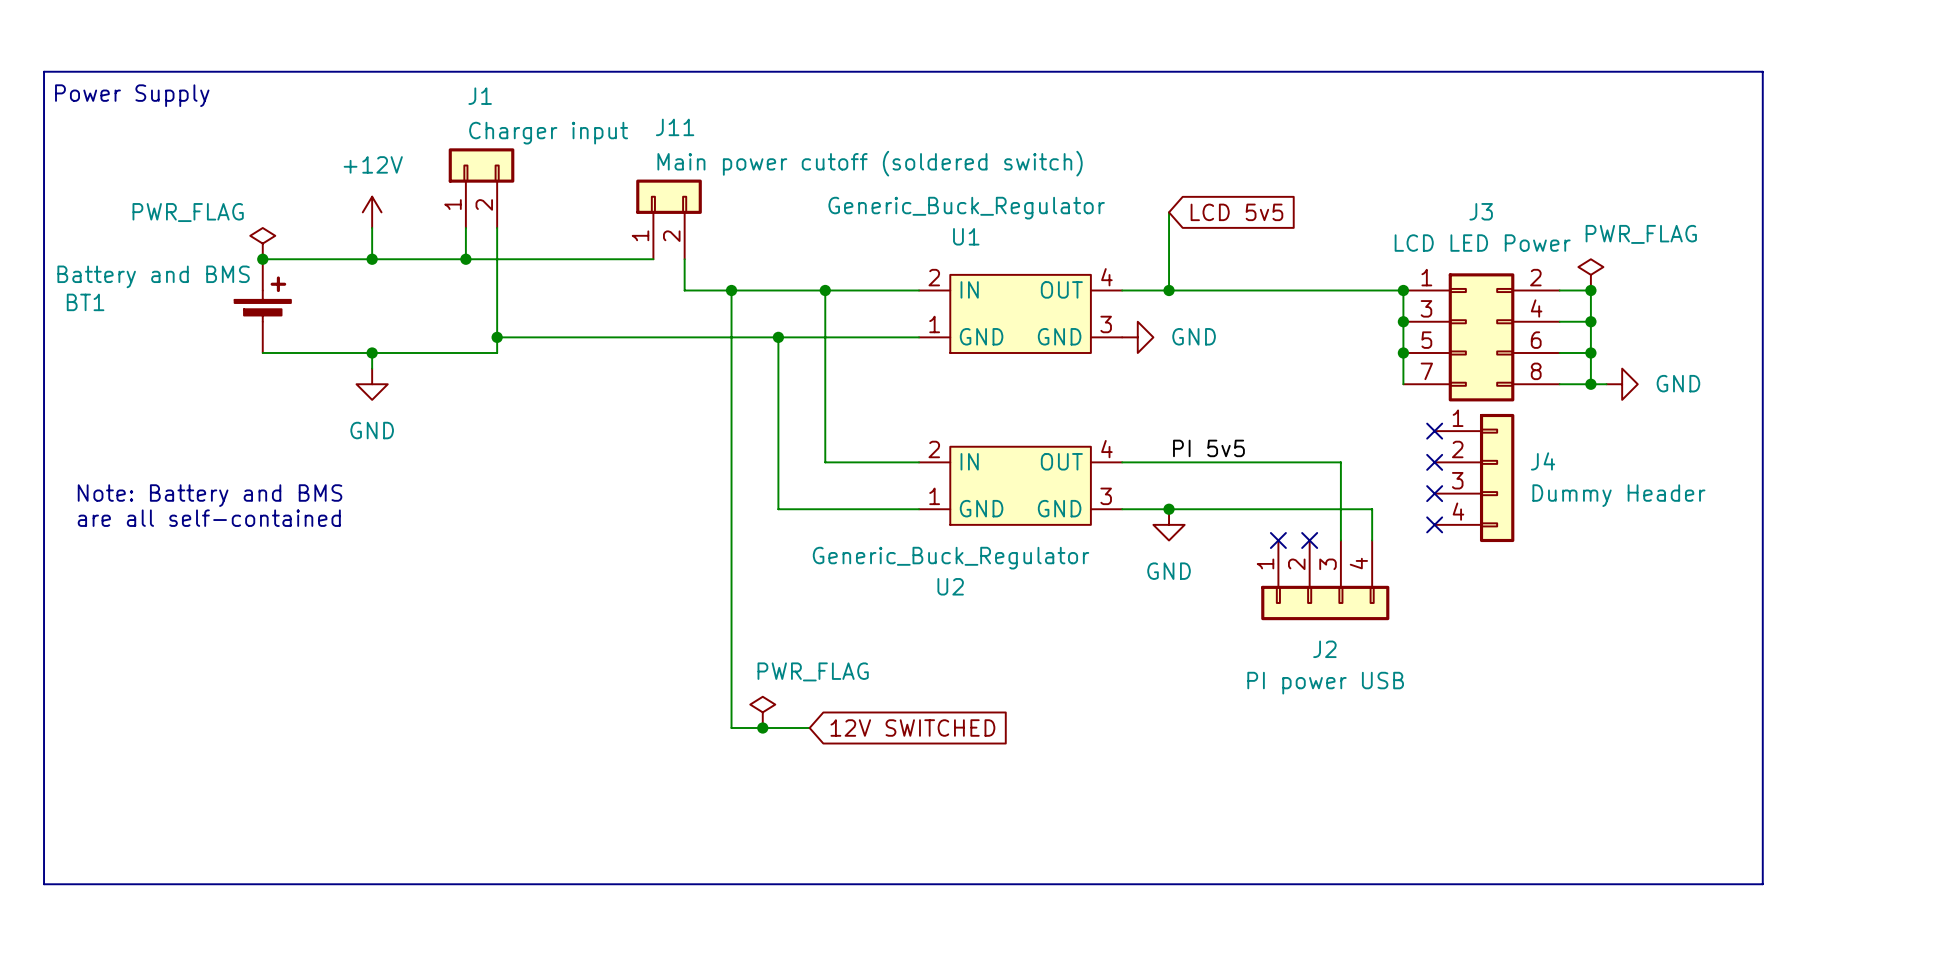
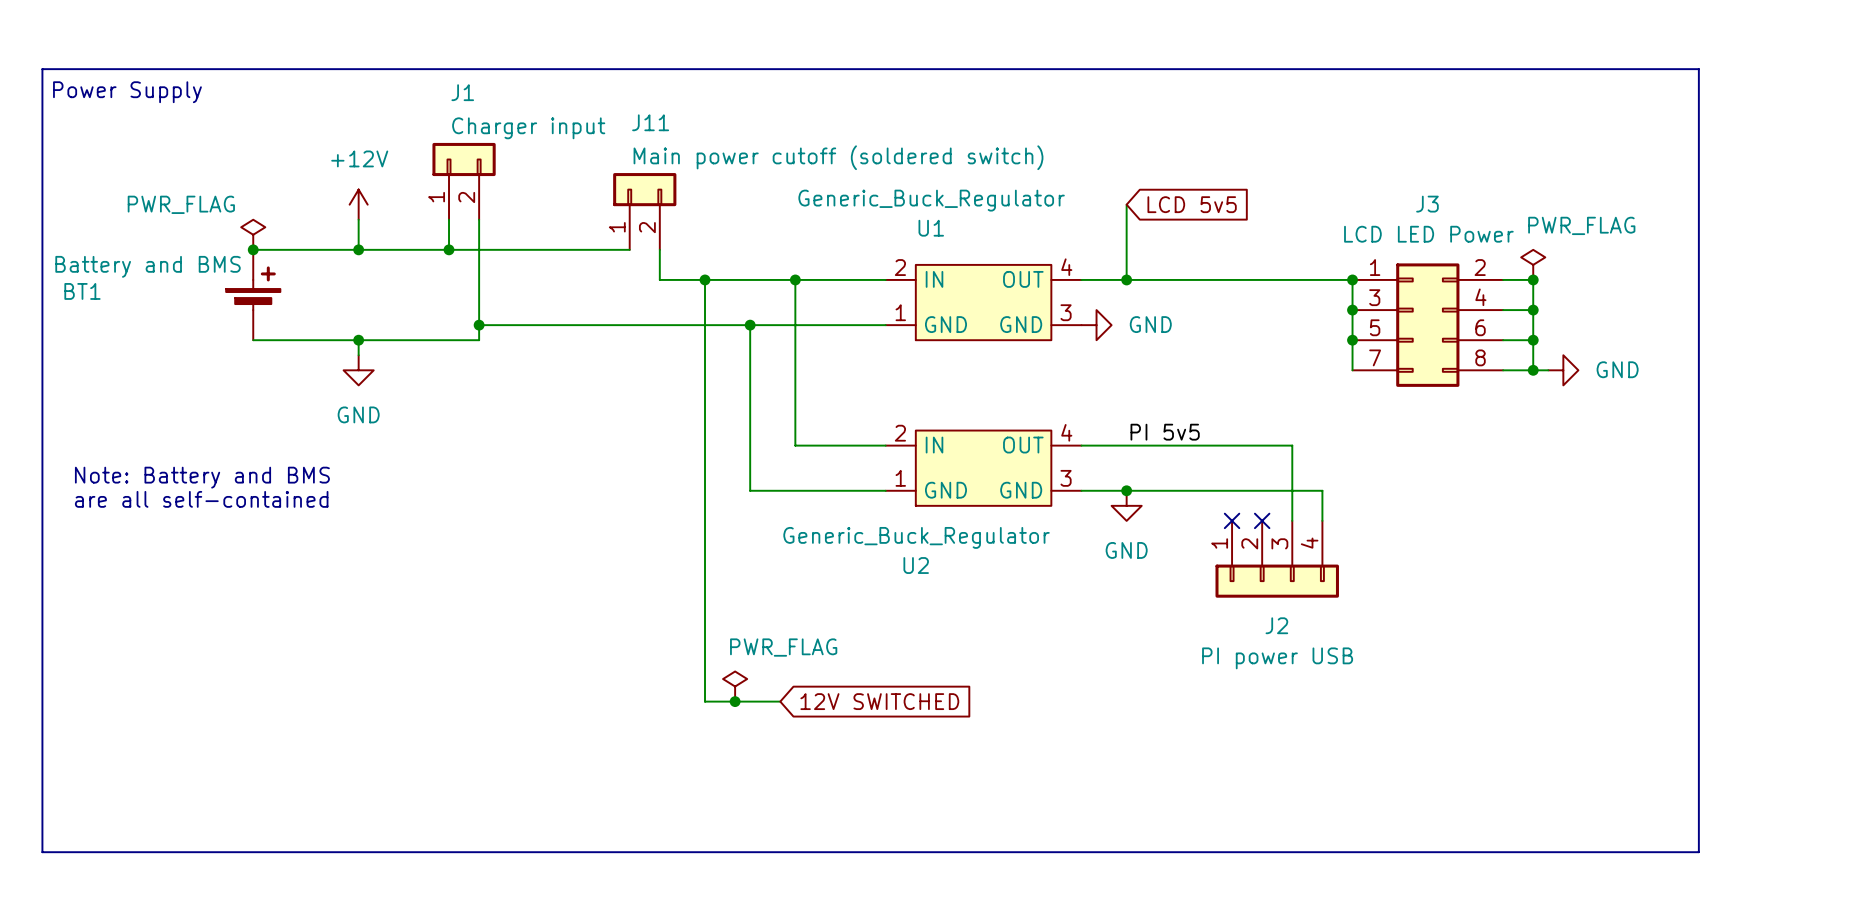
no-connect mark: (1434, 431) -> none
no-connect mark: (1434, 462) -> none
J4: Dummy Header (1474, 477) -> none
no-connect mark: (1434, 493) -> none
no-connect mark: (1434, 524) -> none

